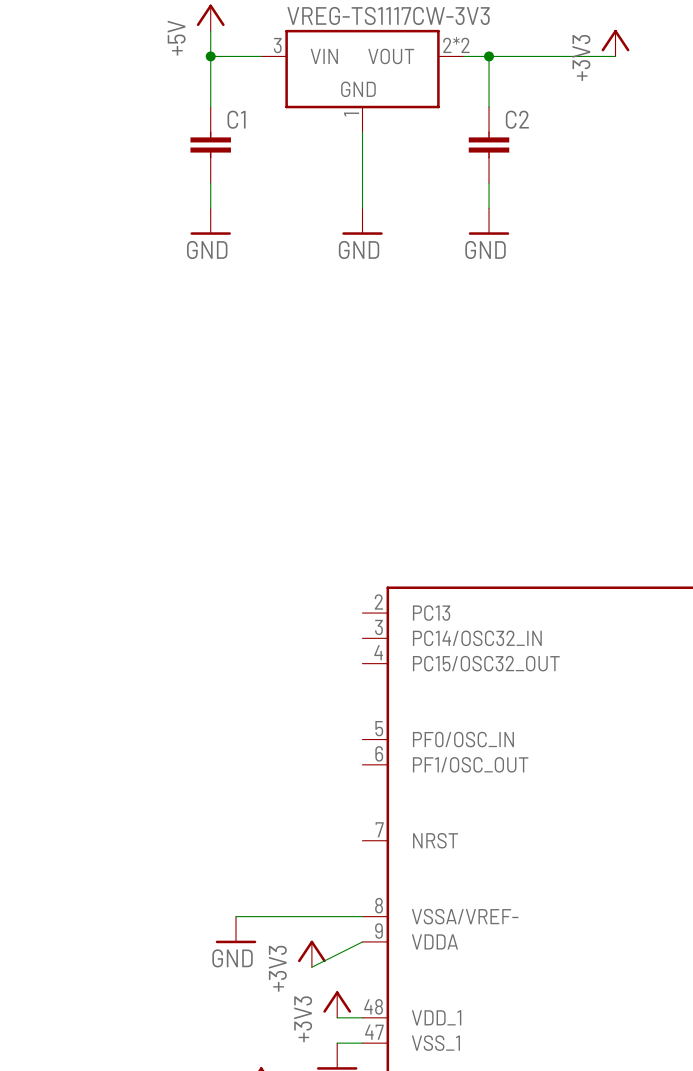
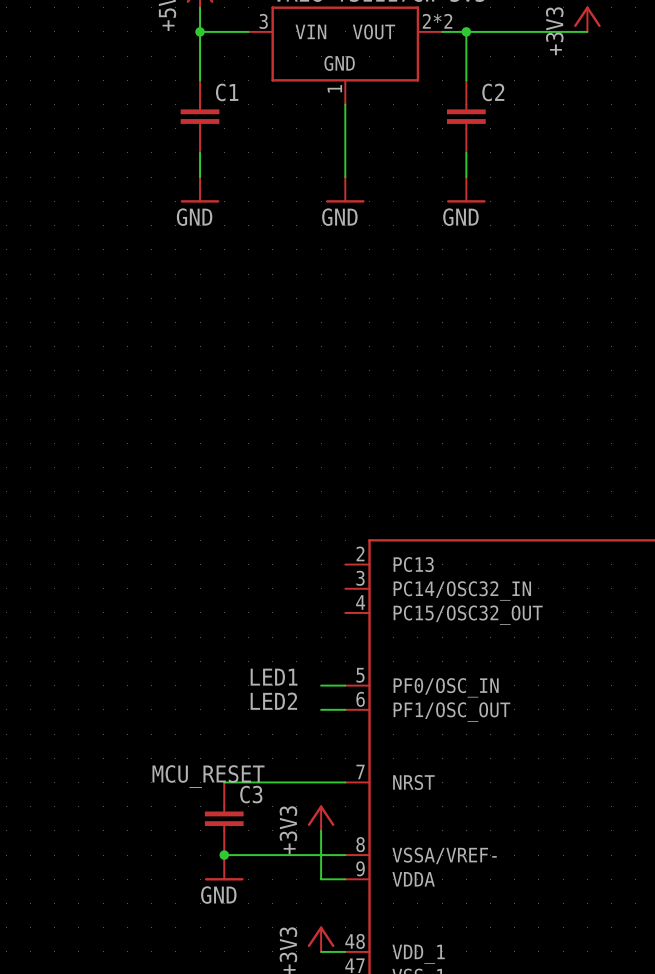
label: none -> LED1 (274, 677)
wire: none -> (321, 685) (345, 685)
label: none -> LED2 (273, 701)
wire: none -> (321, 709) (345, 709)
label: none -> MCU_RESET (208, 776)
wire: none -> (224, 782) (345, 782)
C3: none -> (224, 818)
junction: none -> (224, 855)
wire: (362, 941) (311, 967) -> (345, 879) (321, 879) (321, 830)
power symbol position: +3V3 (311, 953) -> +3V3 (321, 818)

